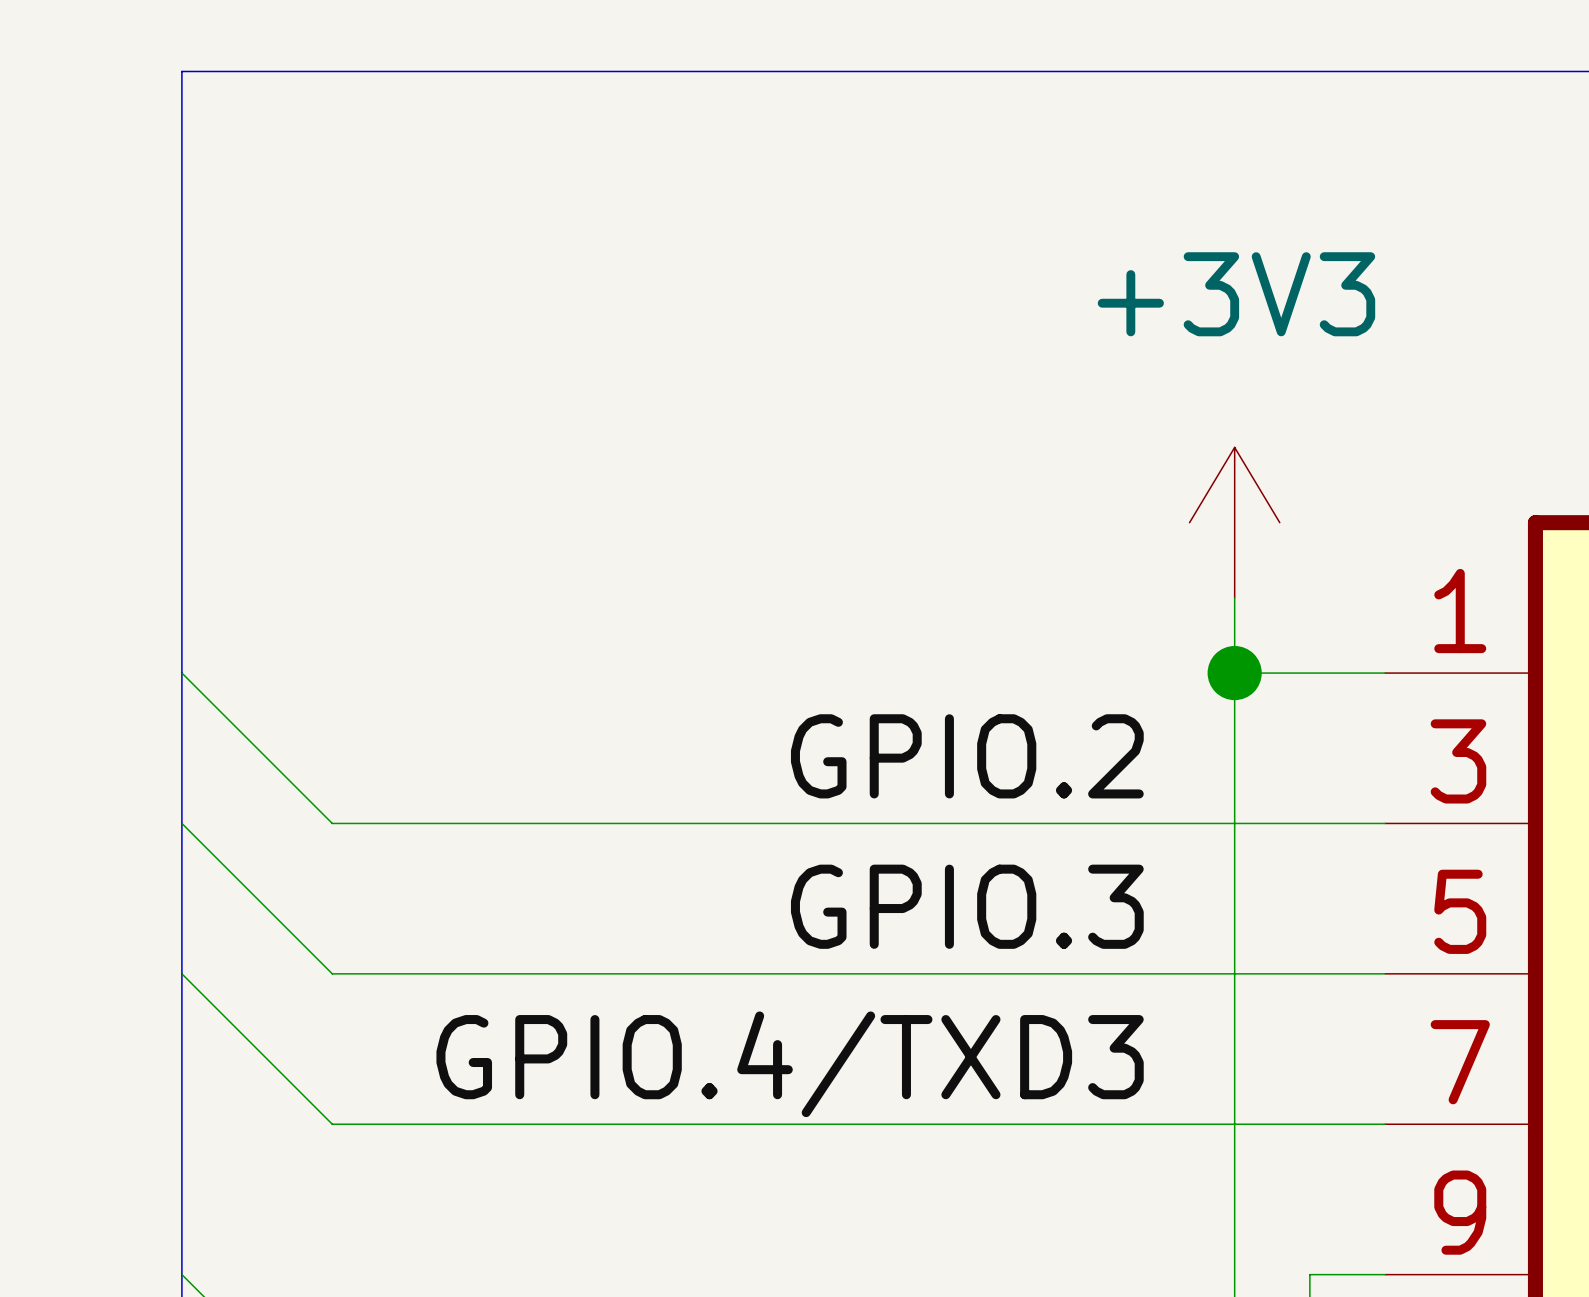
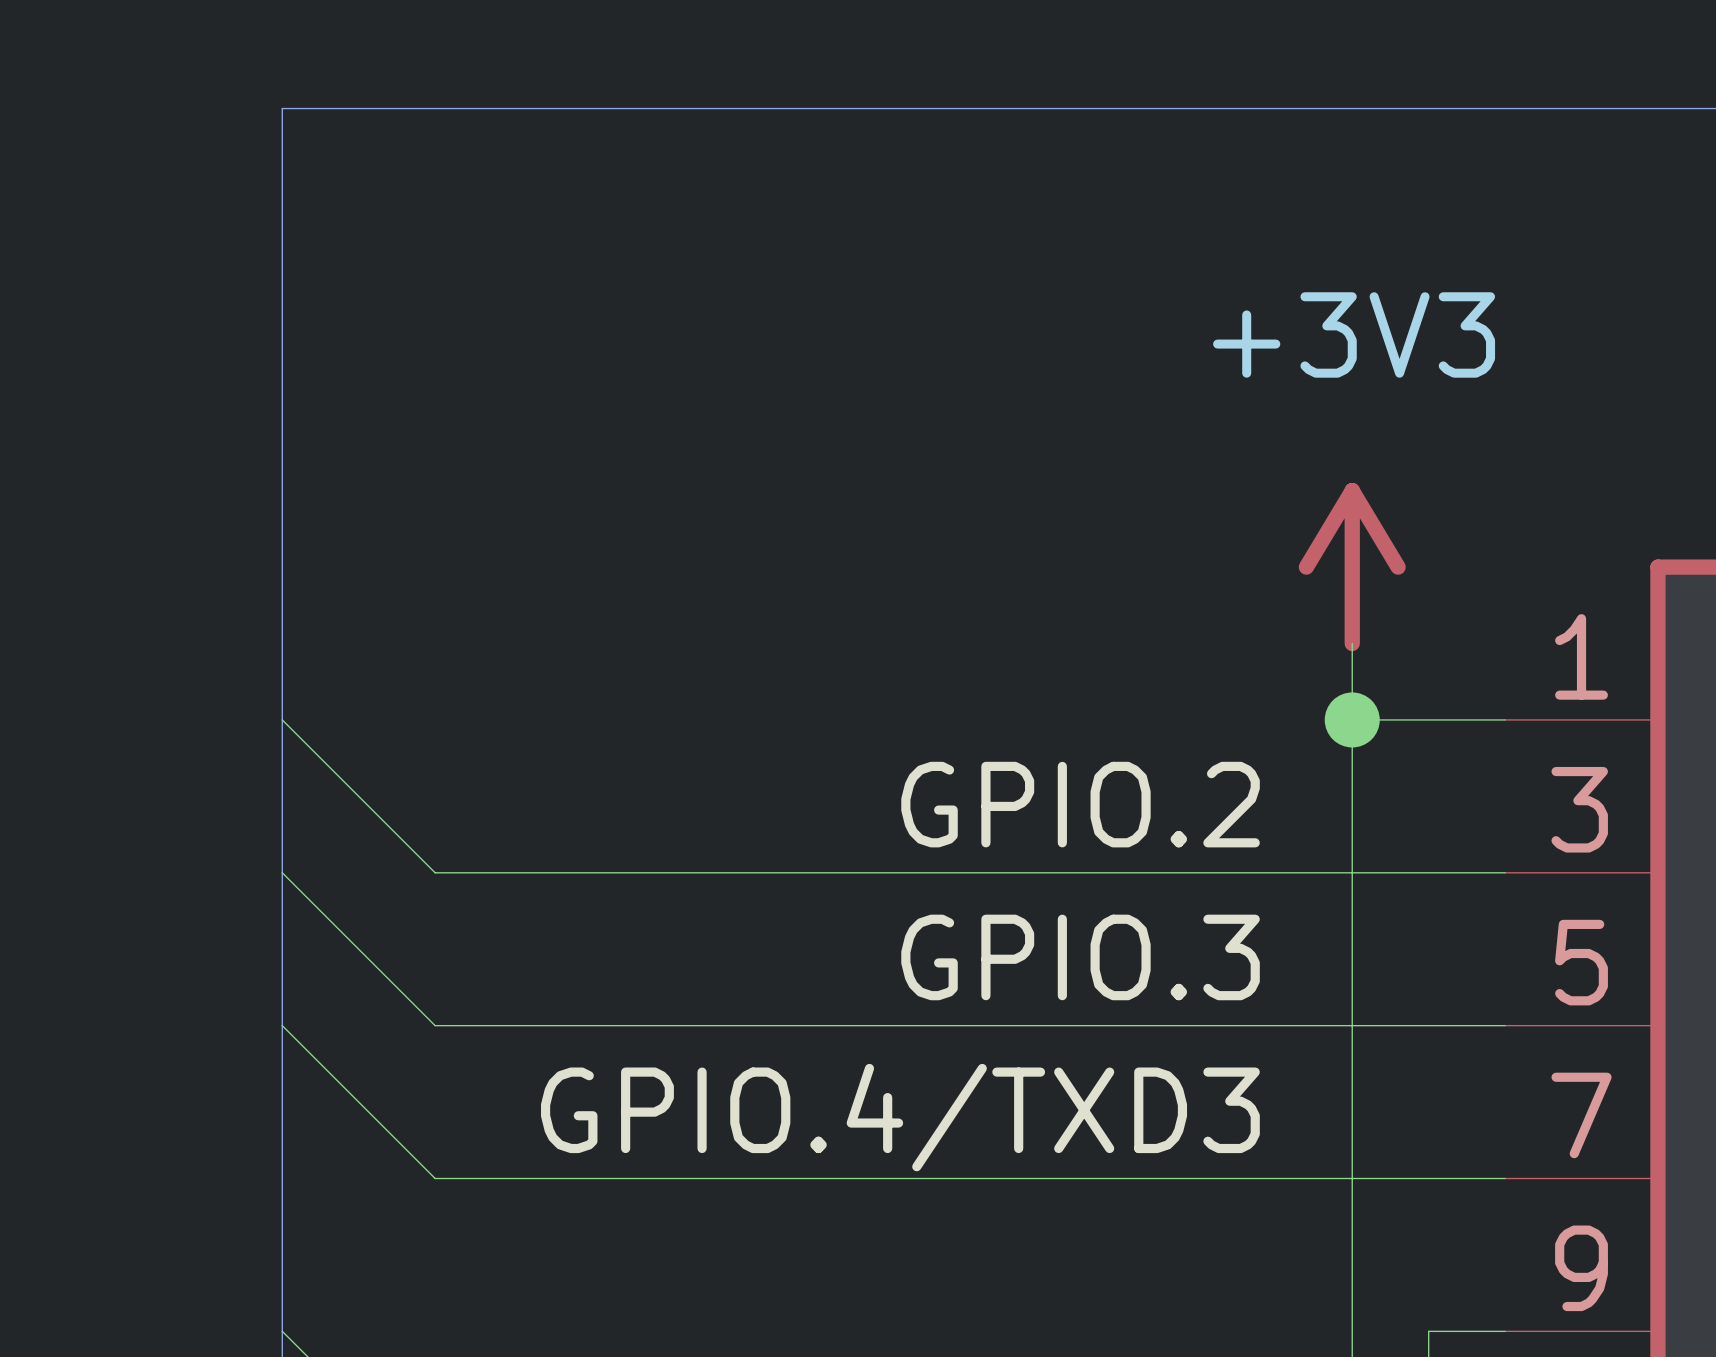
power symbol shape: [1189, 447, 1280, 598] -> [1298, 483, 1406, 652]

